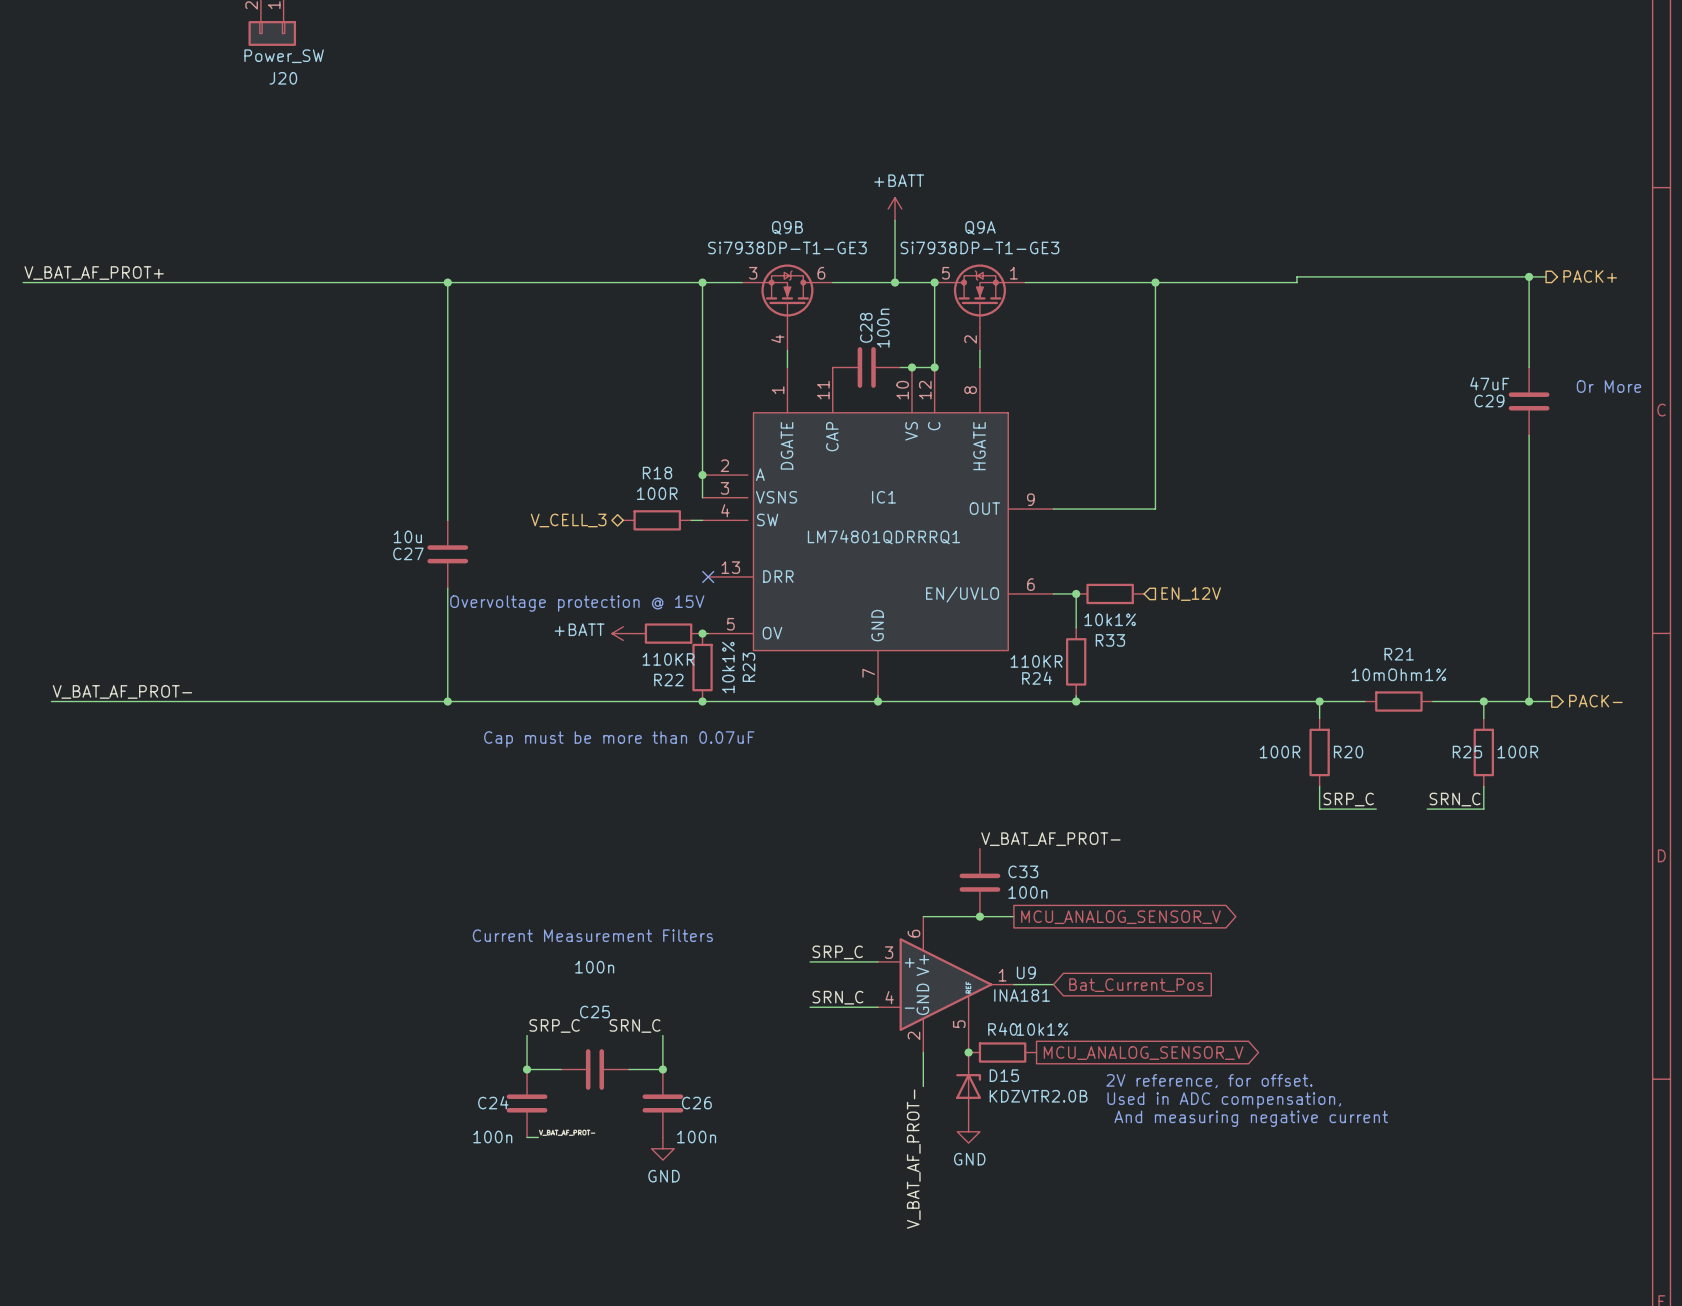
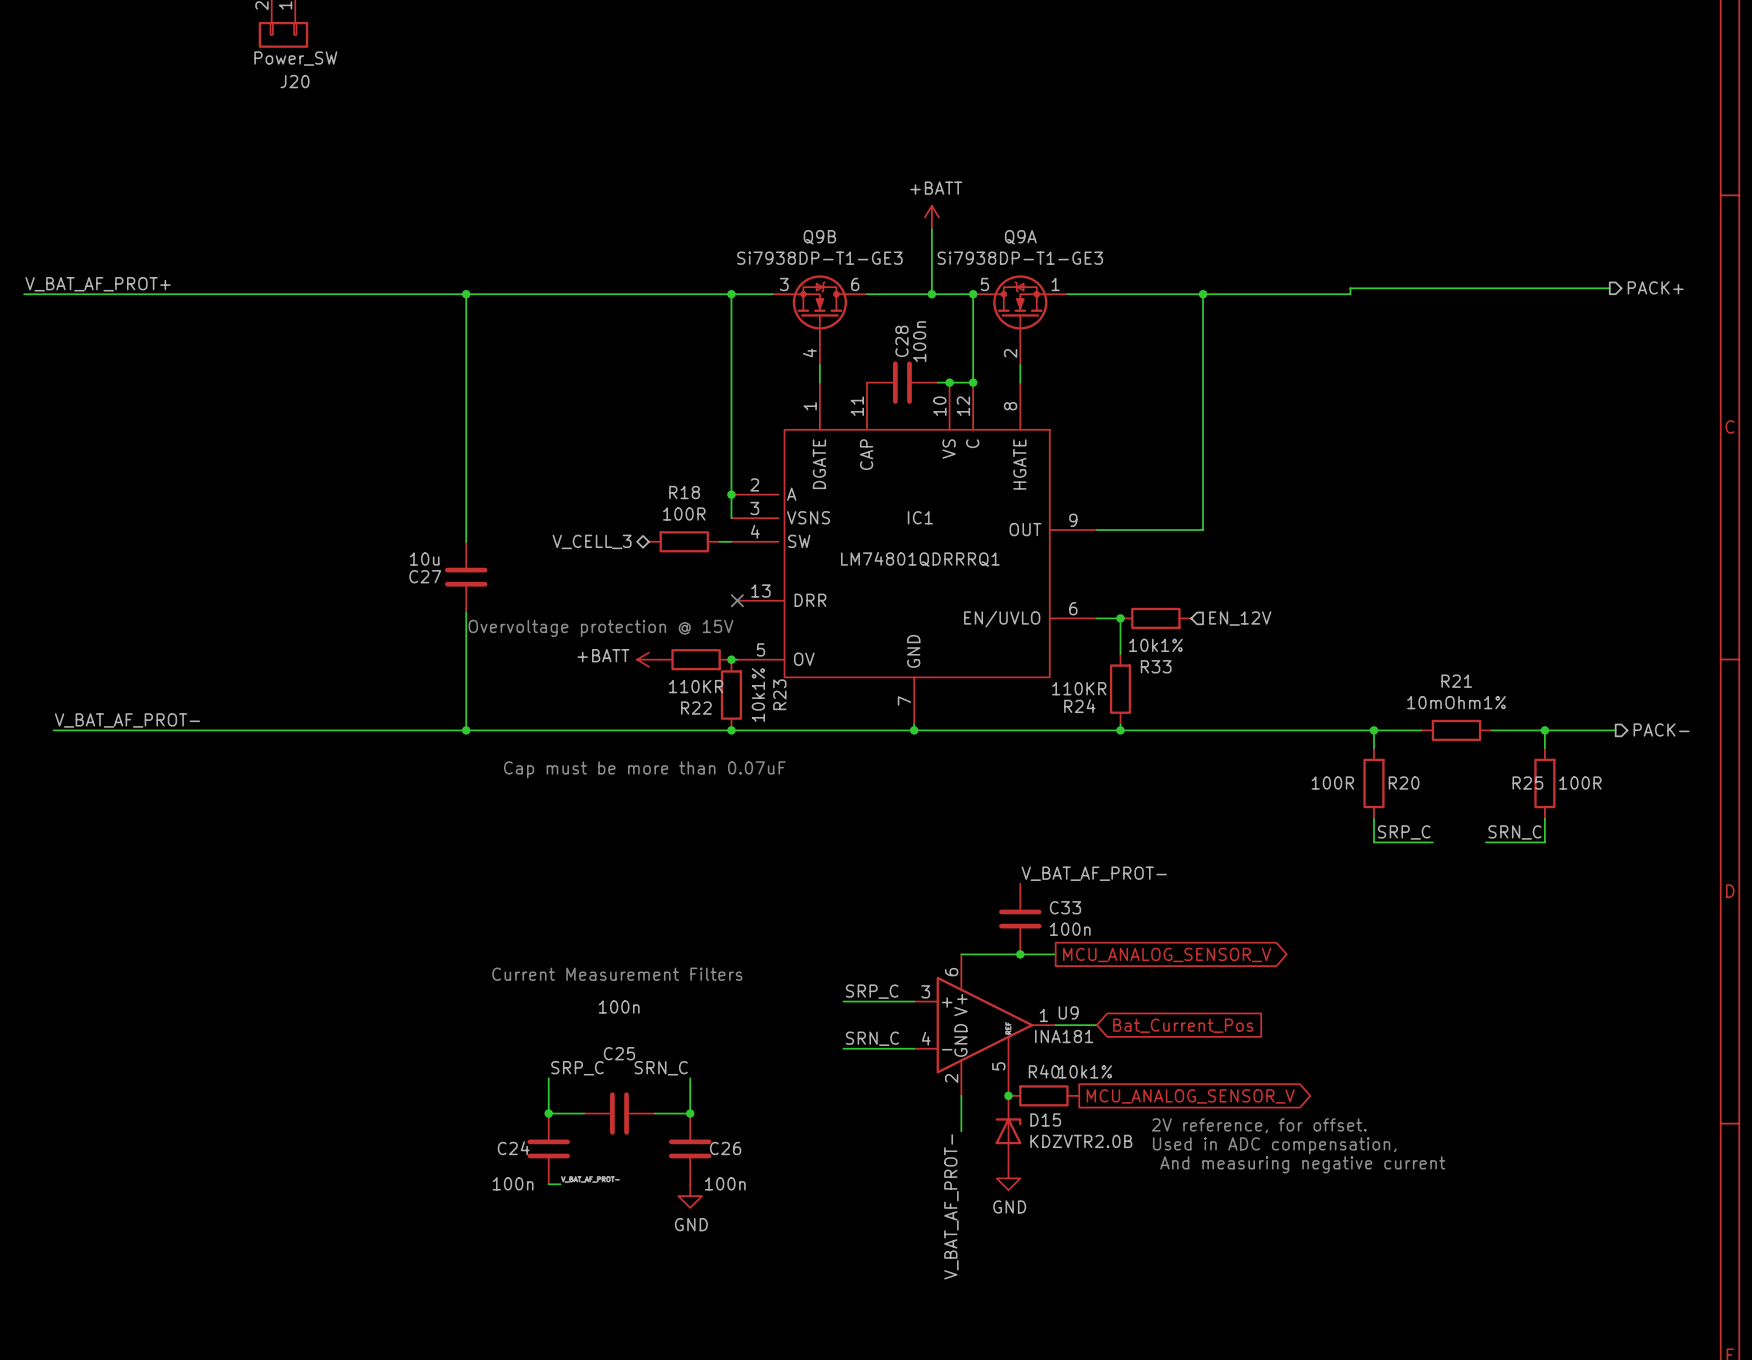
wire: (1529, 276) (1529, 367) -> none
junction: (1529, 276) -> none
text: Or More (1608, 386) -> none
C29: 47uF (1529, 401) -> none
wire: (1529, 435) (1529, 701) -> none
junction: (1529, 701) -> none

